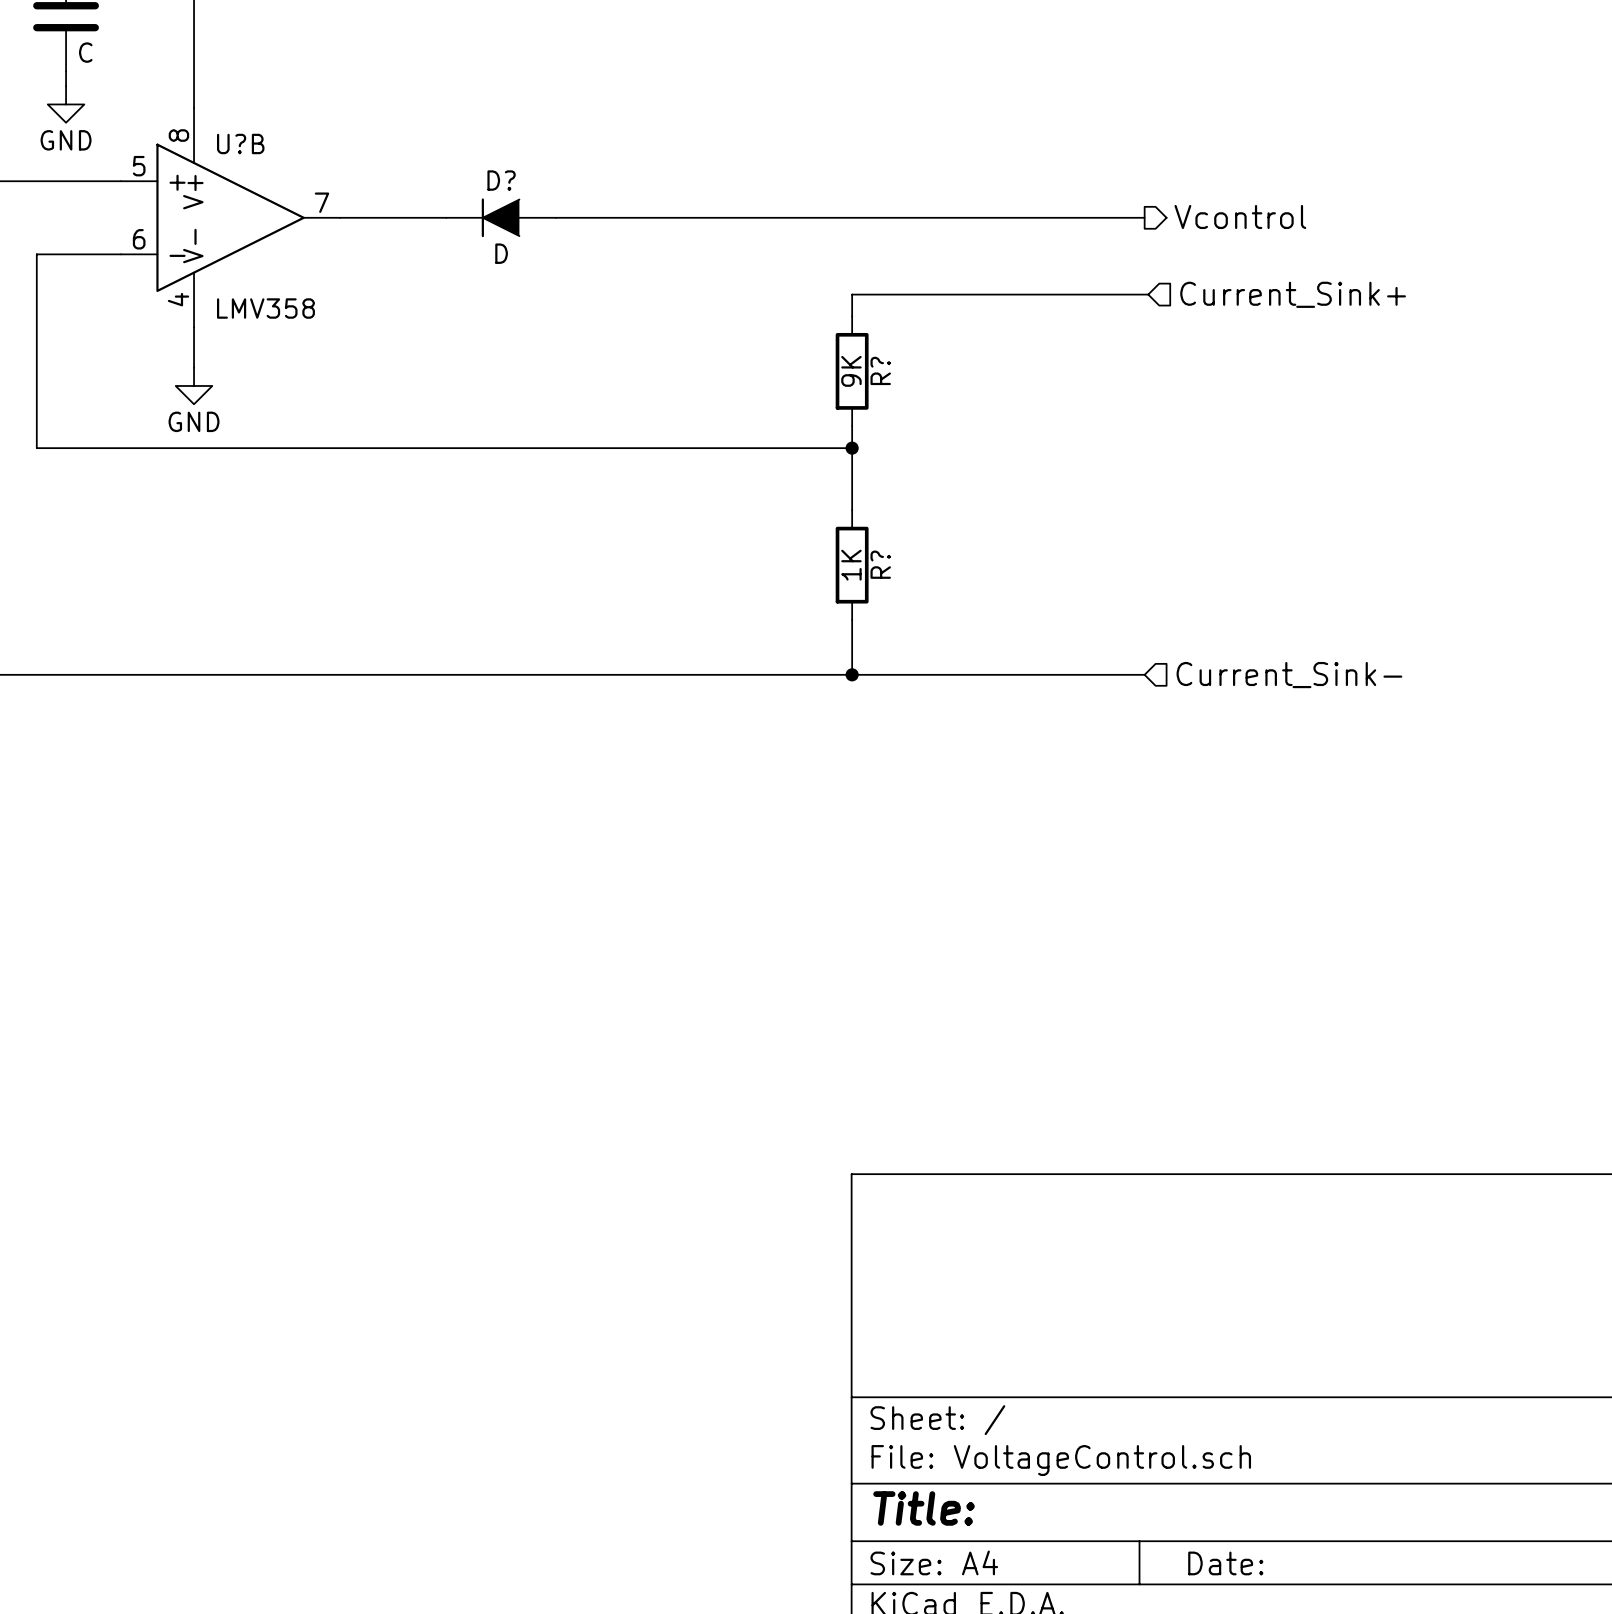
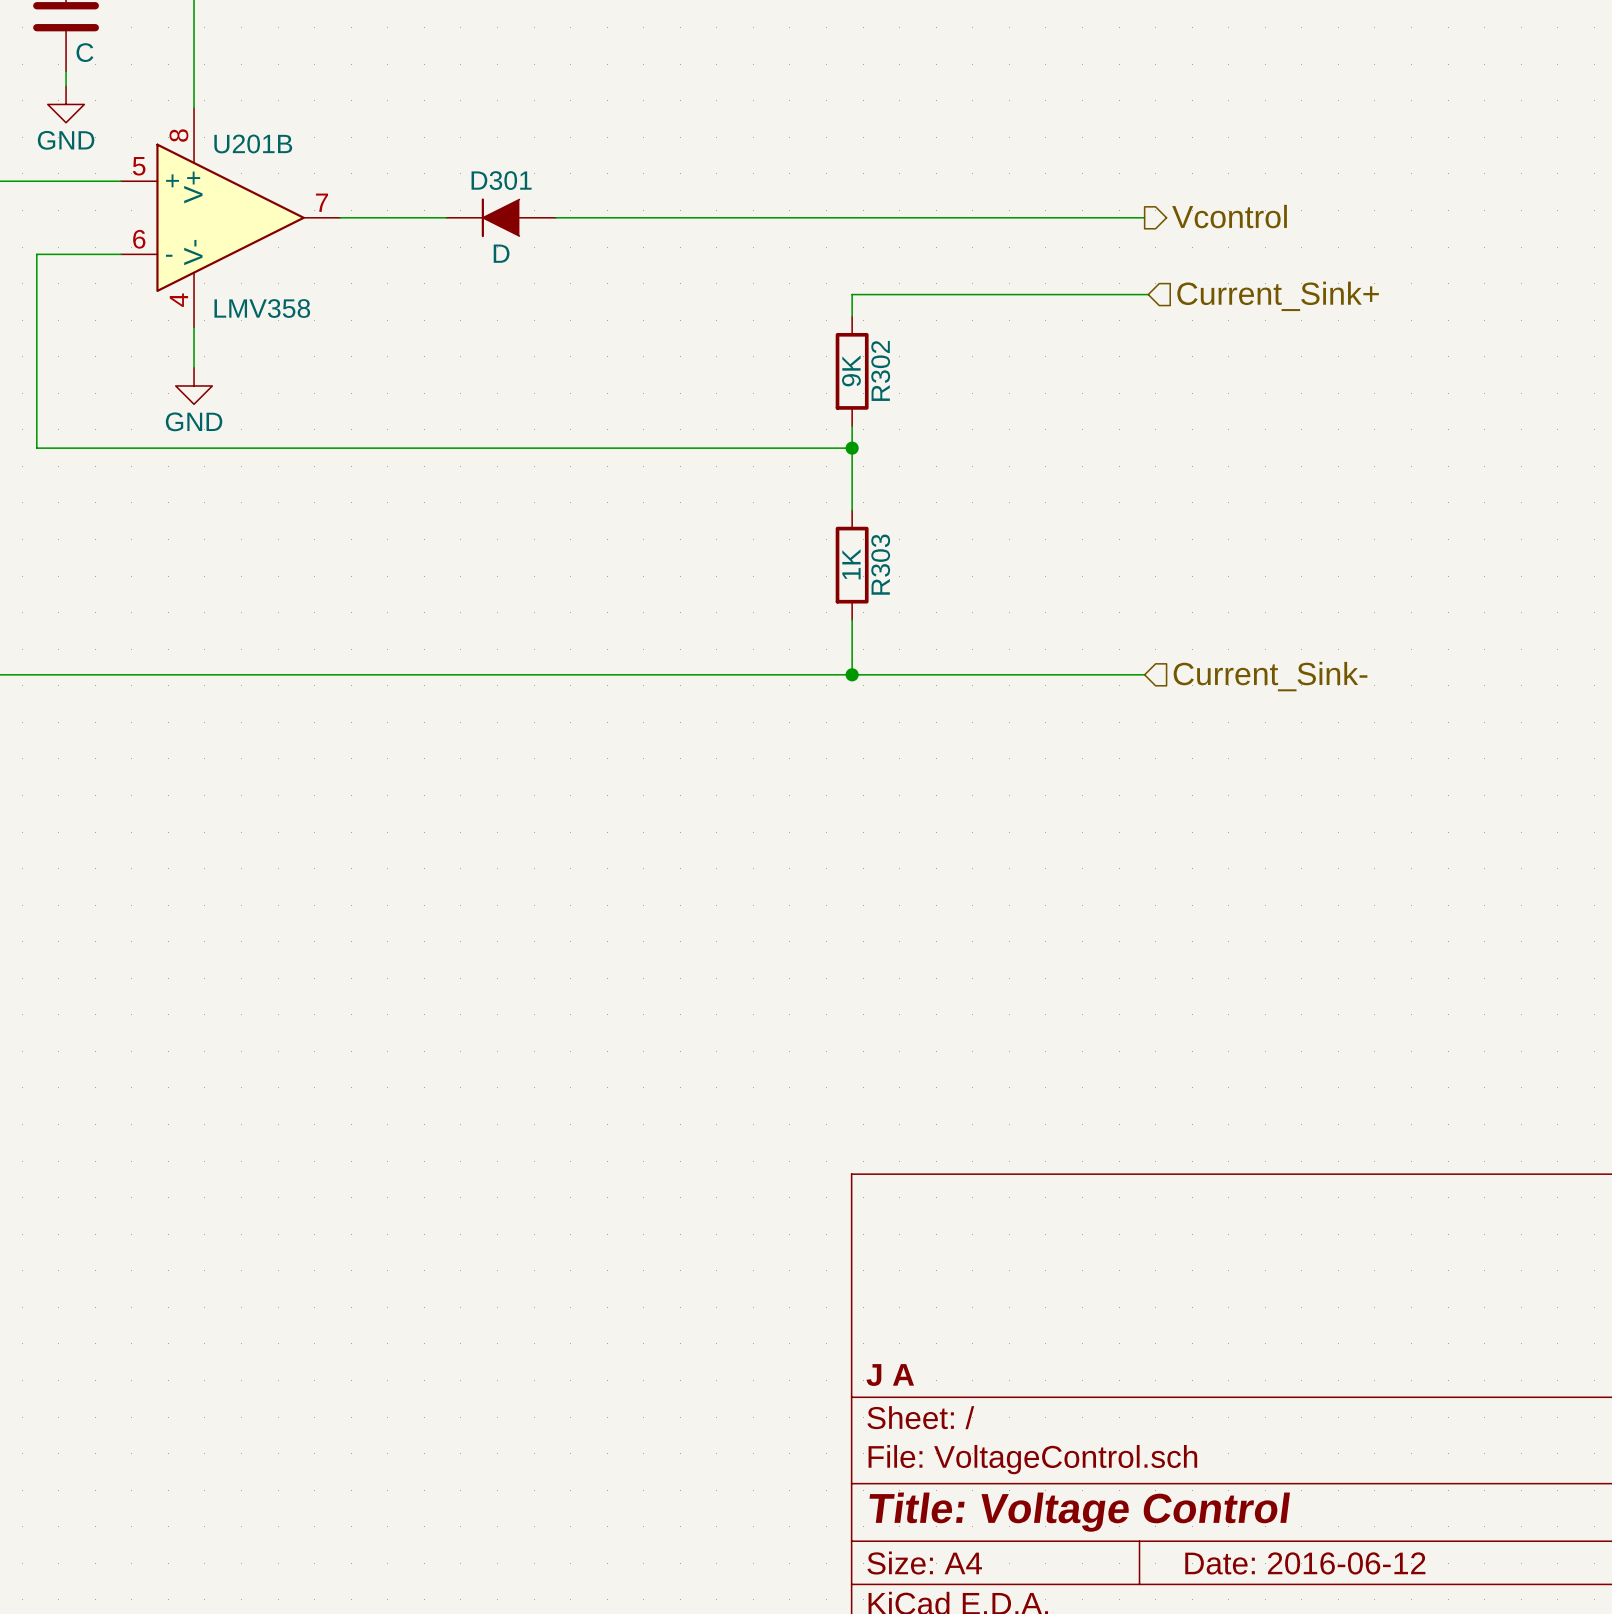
U?B name: U?B (240, 143) -> U201B (253, 143)
D? name: D? (501, 180) -> D301 (501, 180)
R? name: R? (880, 370) -> R302 (880, 370)
R? name: R? (880, 564) -> R303 (880, 564)
title block: none -> J A (890, 1375)
title block: Title: (924, 1508) -> Title: Voltage Control (1079, 1512)
title block: Date: (1225, 1563) -> Date: 2016-06-12 (1305, 1563)

